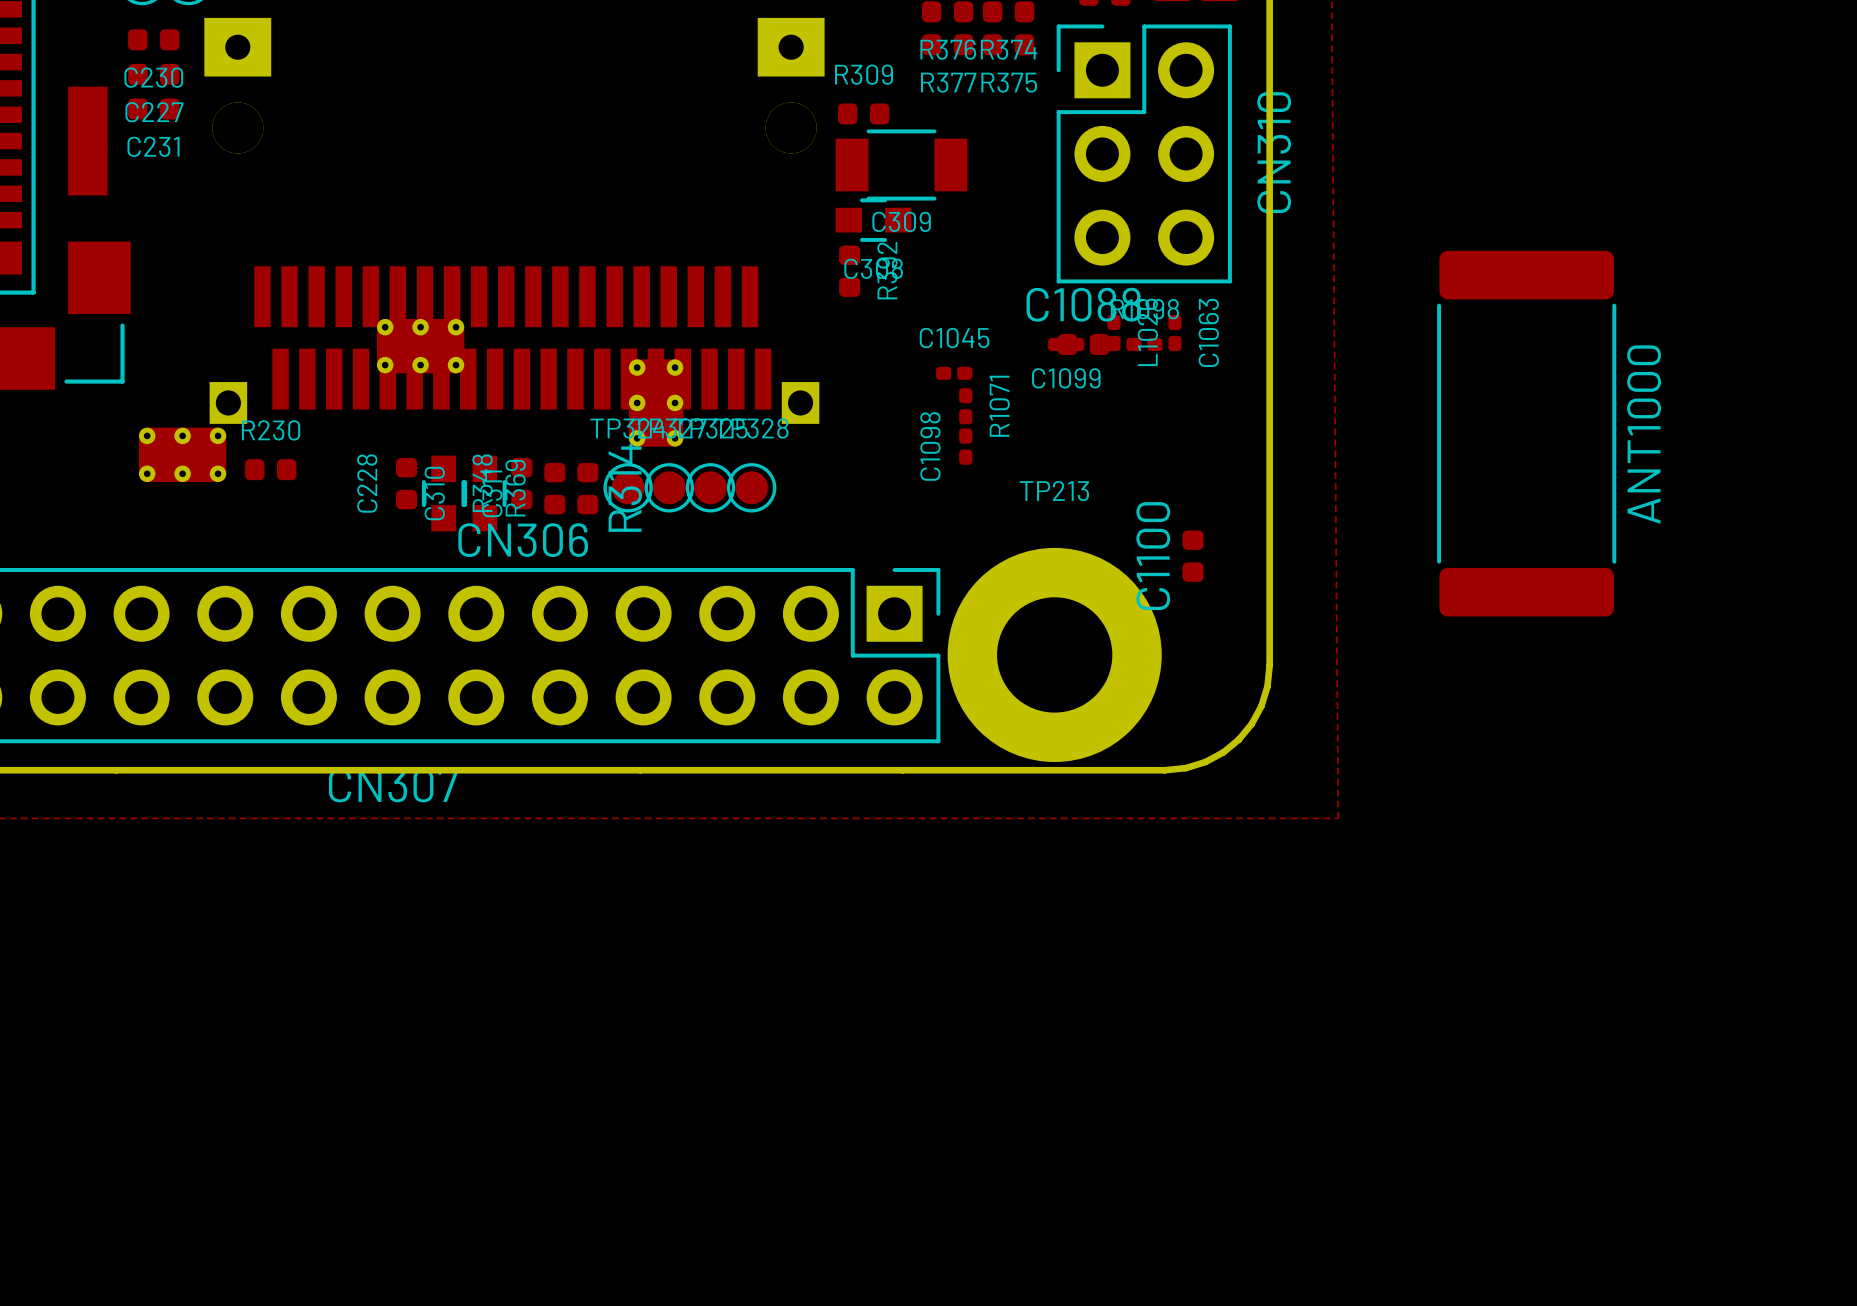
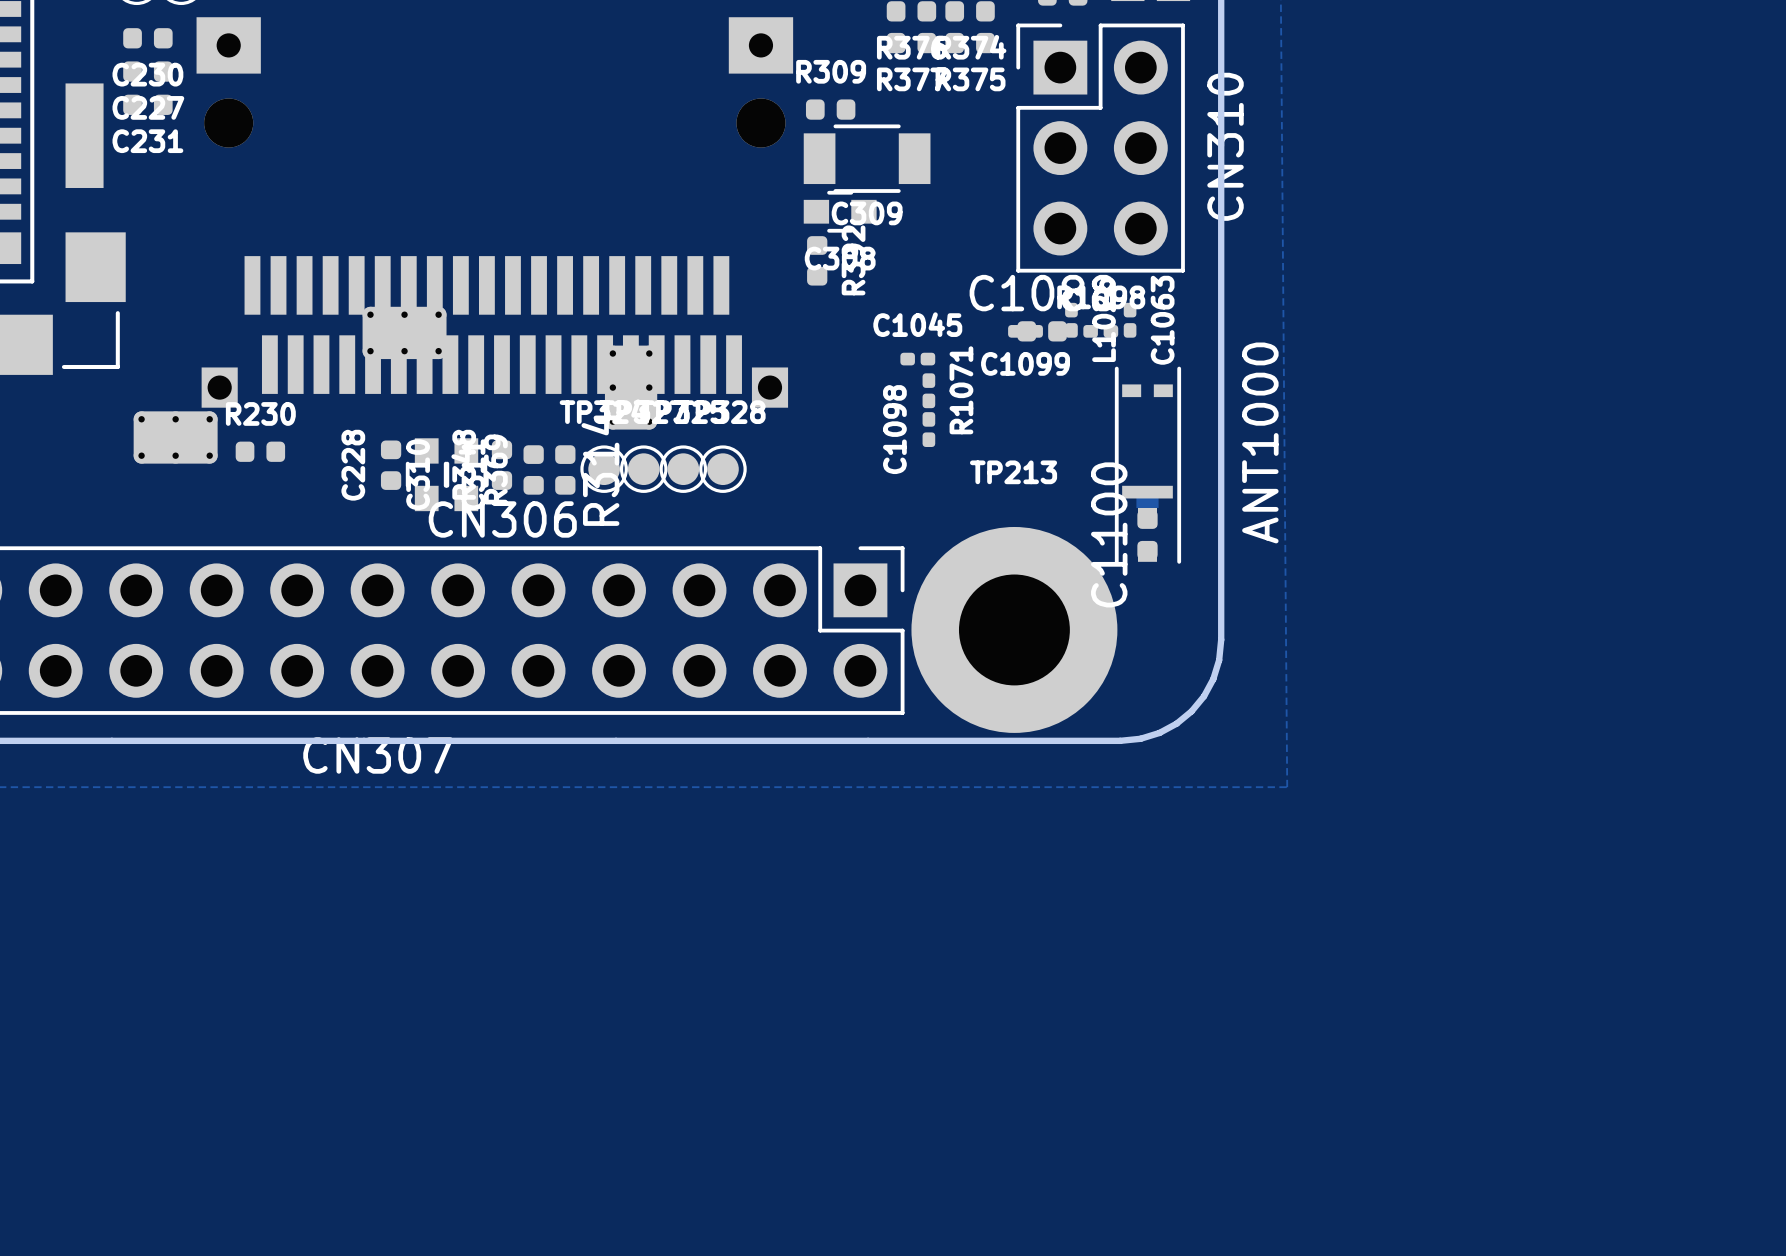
ANT1000 footprint: [1437, 250, 1617, 617] -> [1114, 366, 1182, 564]

